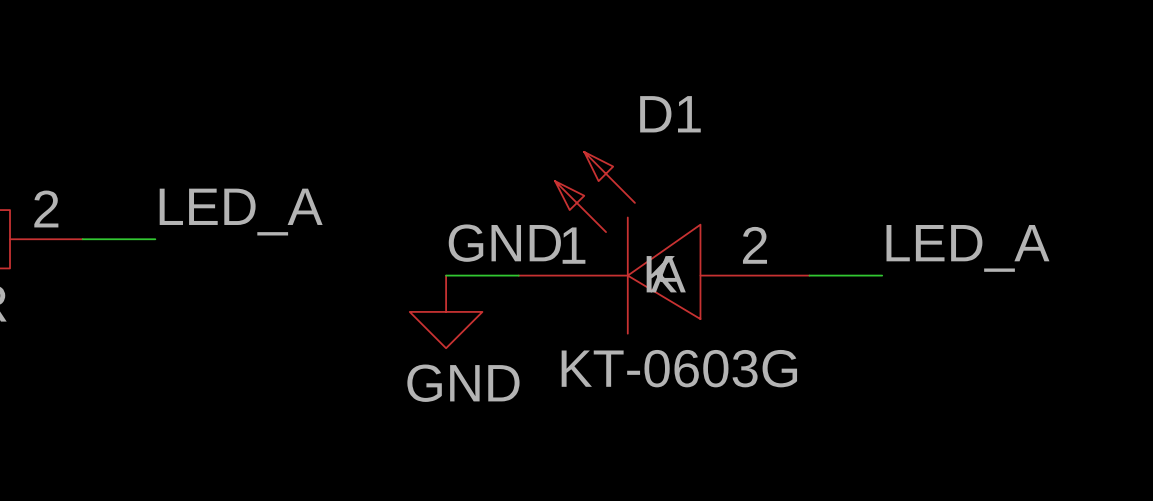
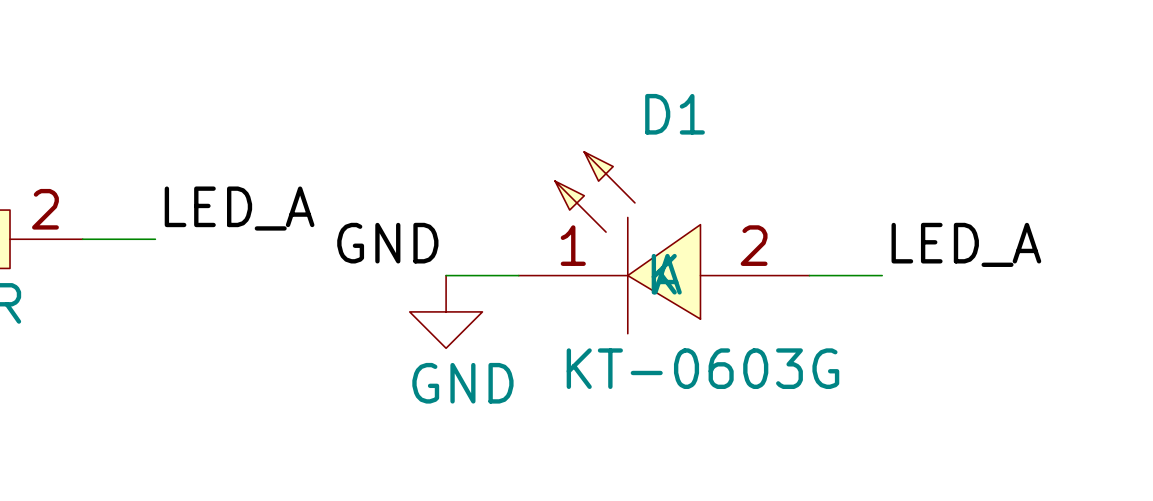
label position: GND (504, 243) -> GND (387, 243)

